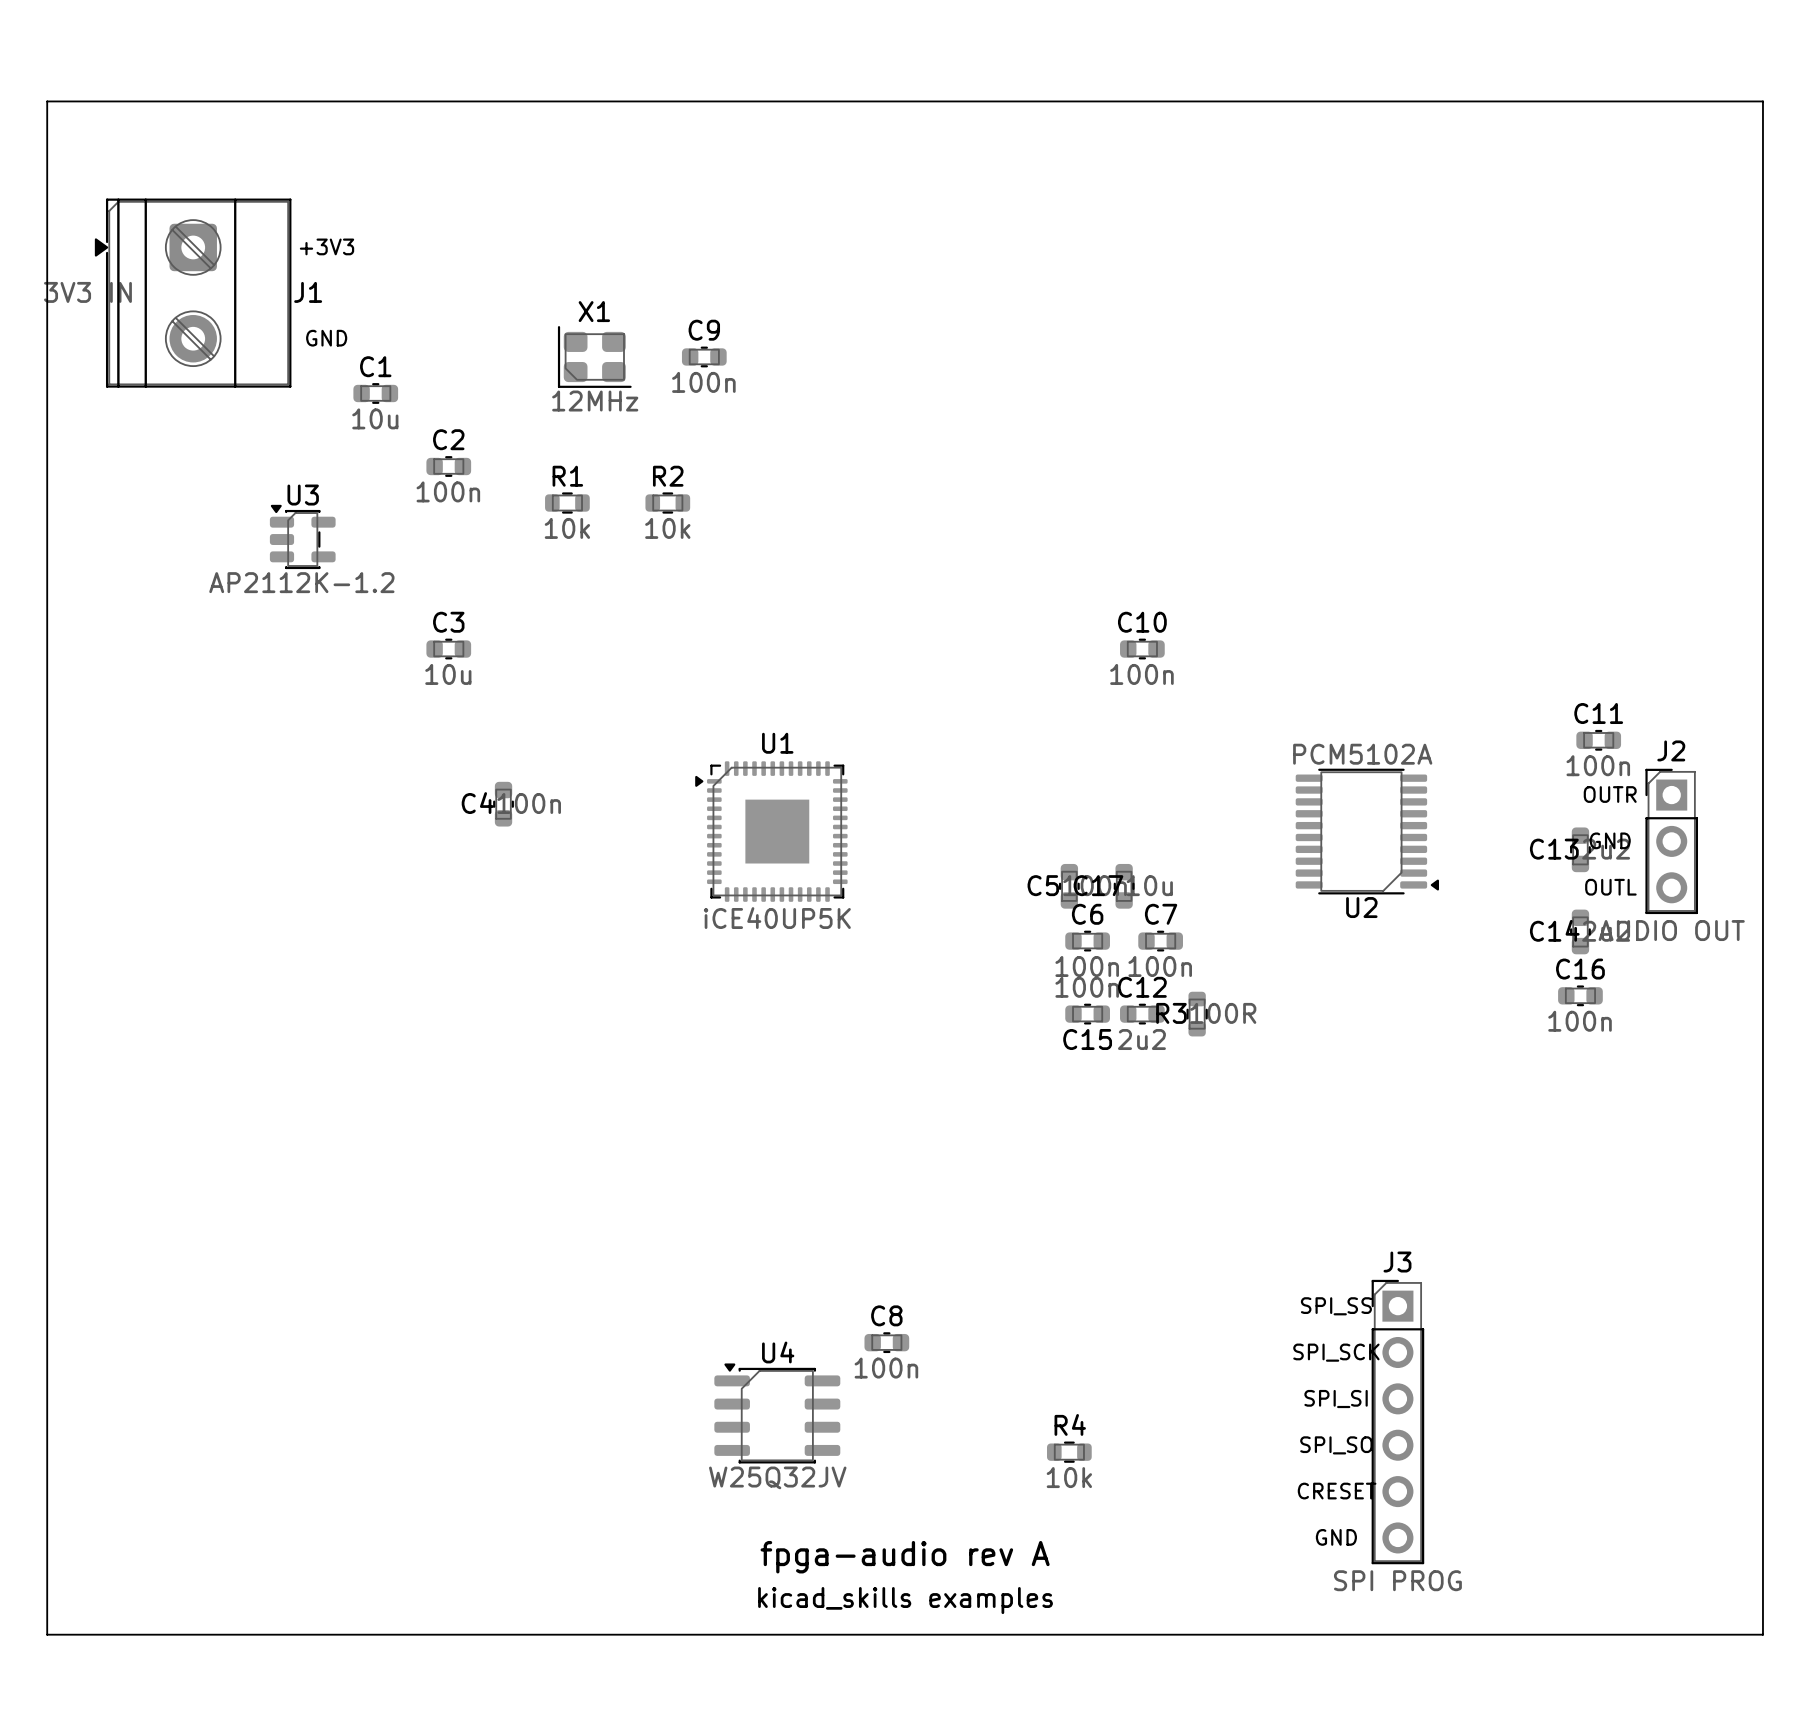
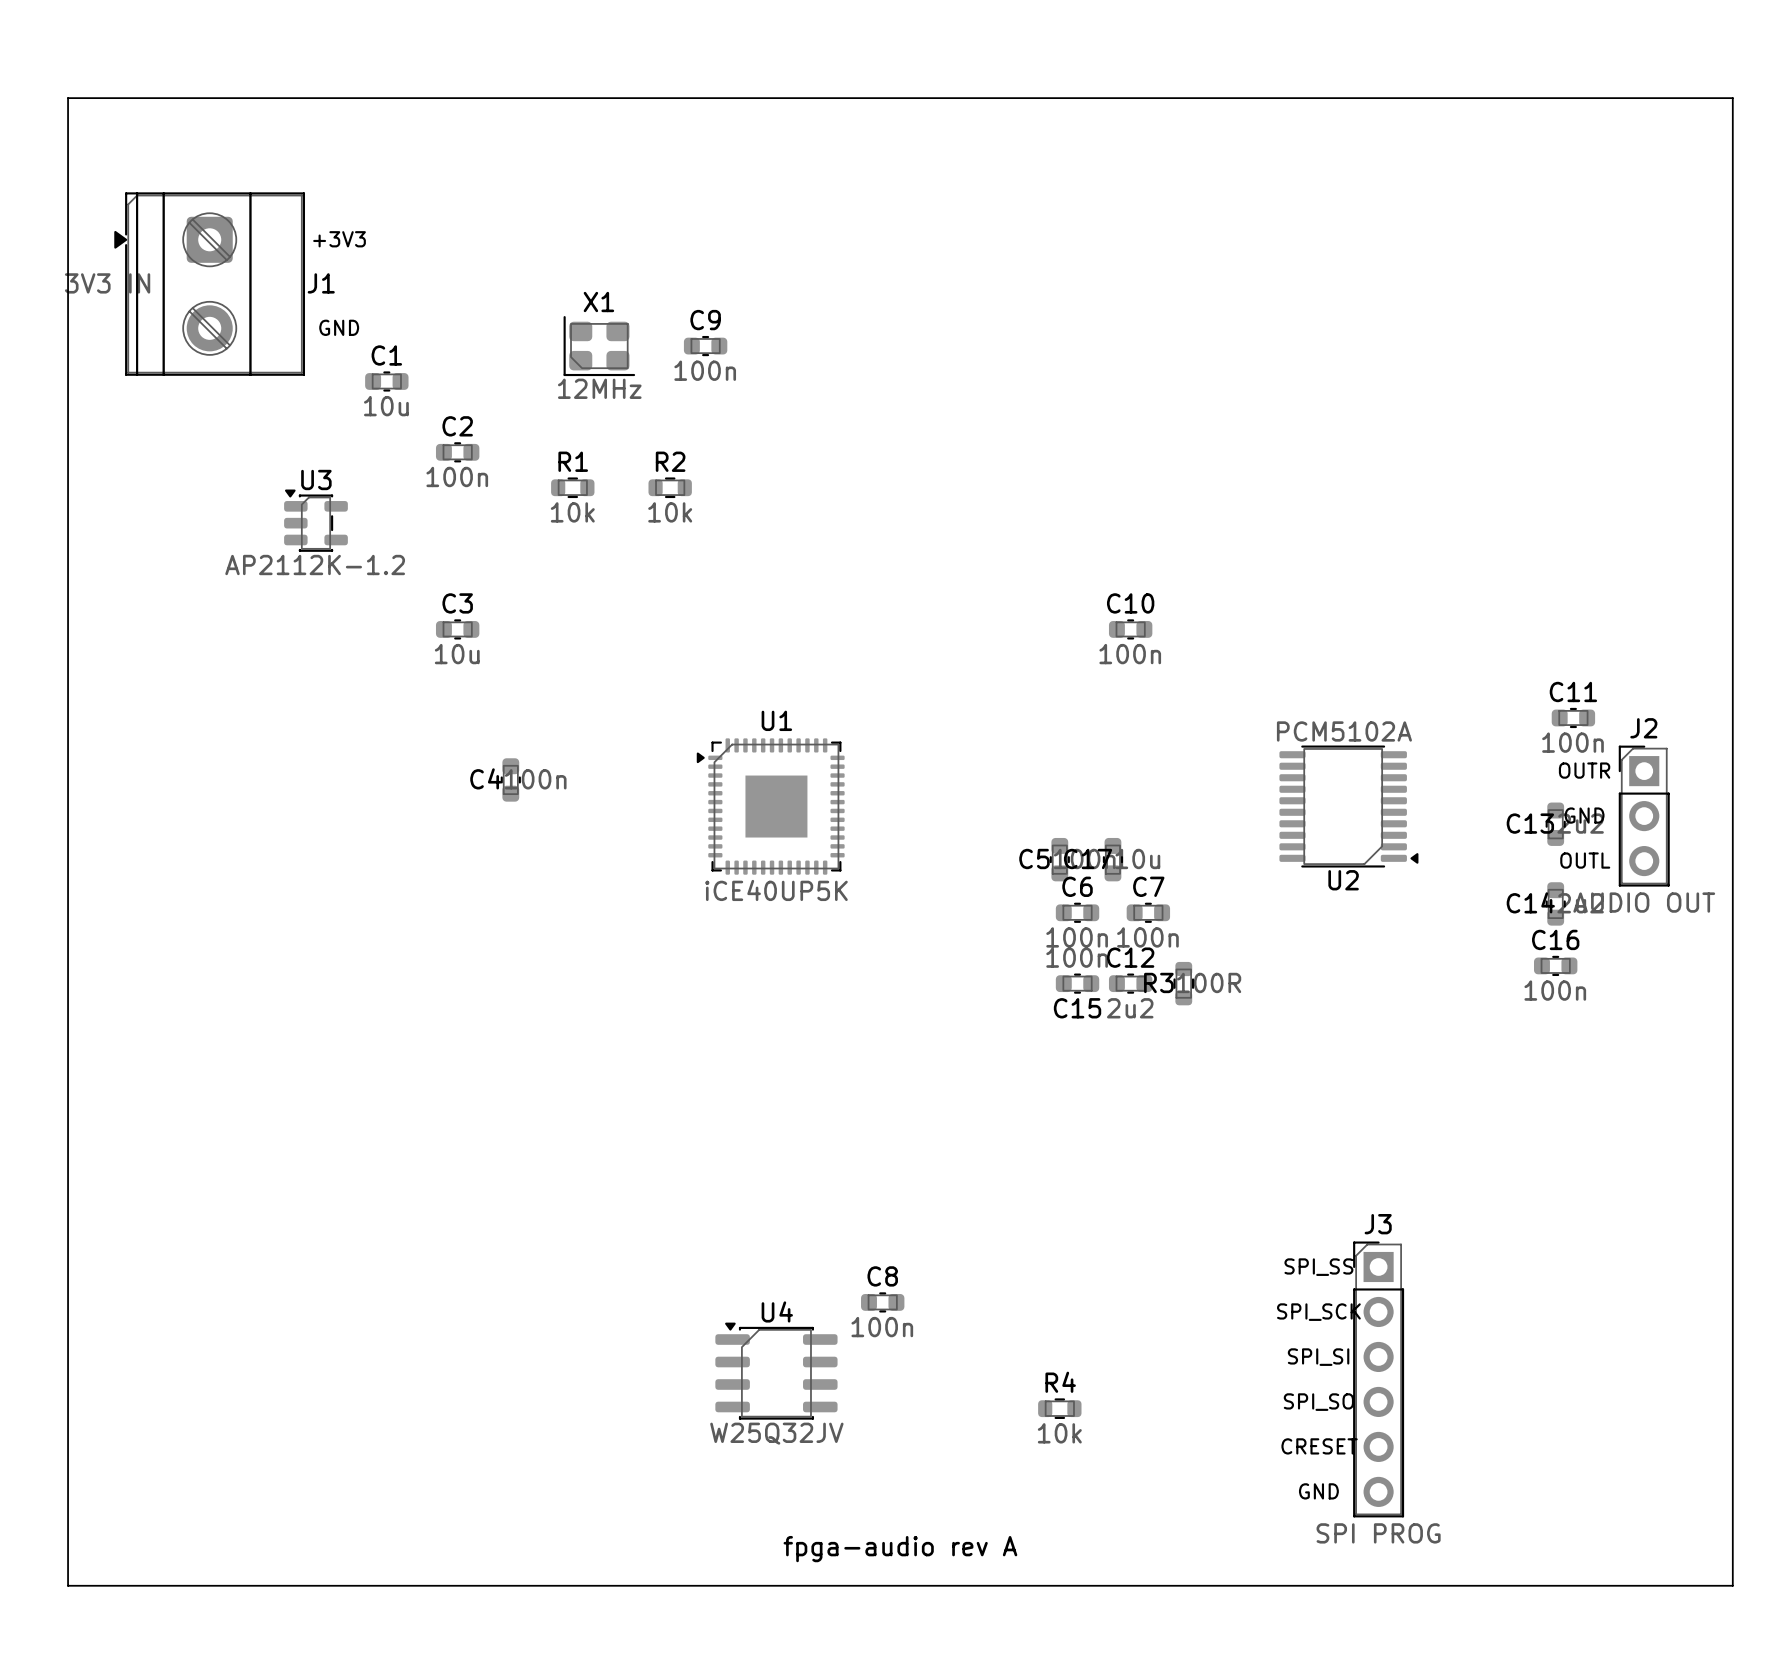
text: fpga-audio rev A (905, 1557) -> none
text: kicad_skills examples (905, 1600) -> fpga-audio rev A (900, 1549)

